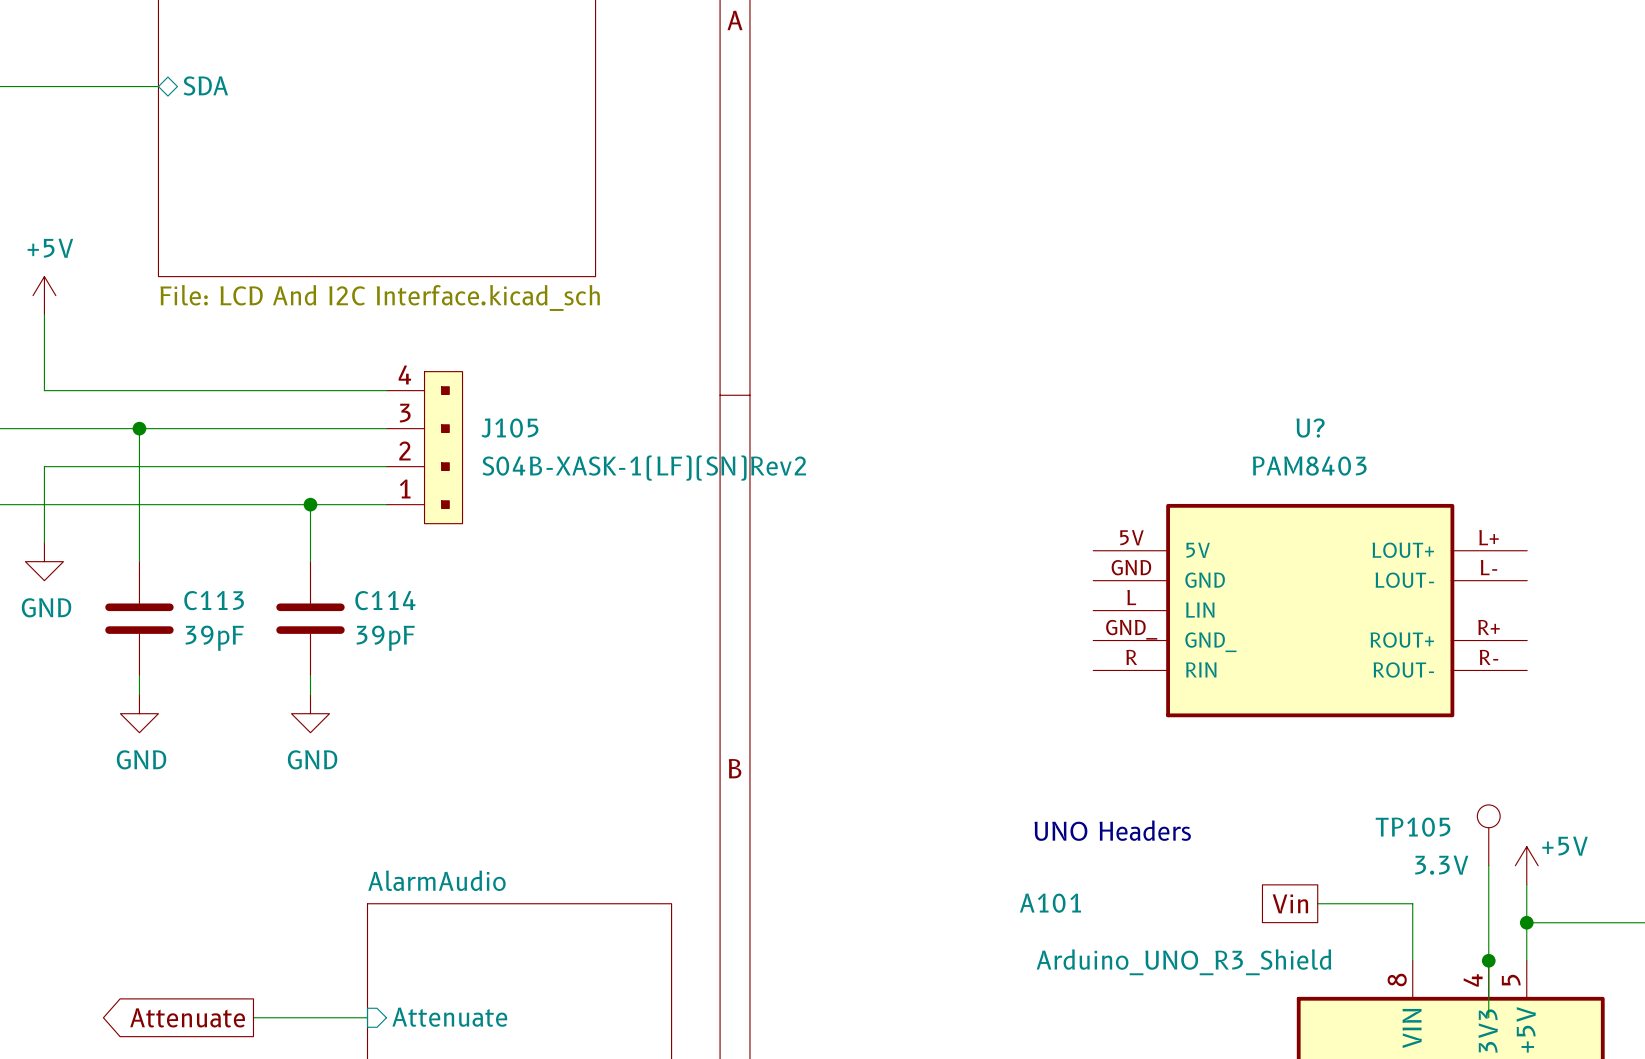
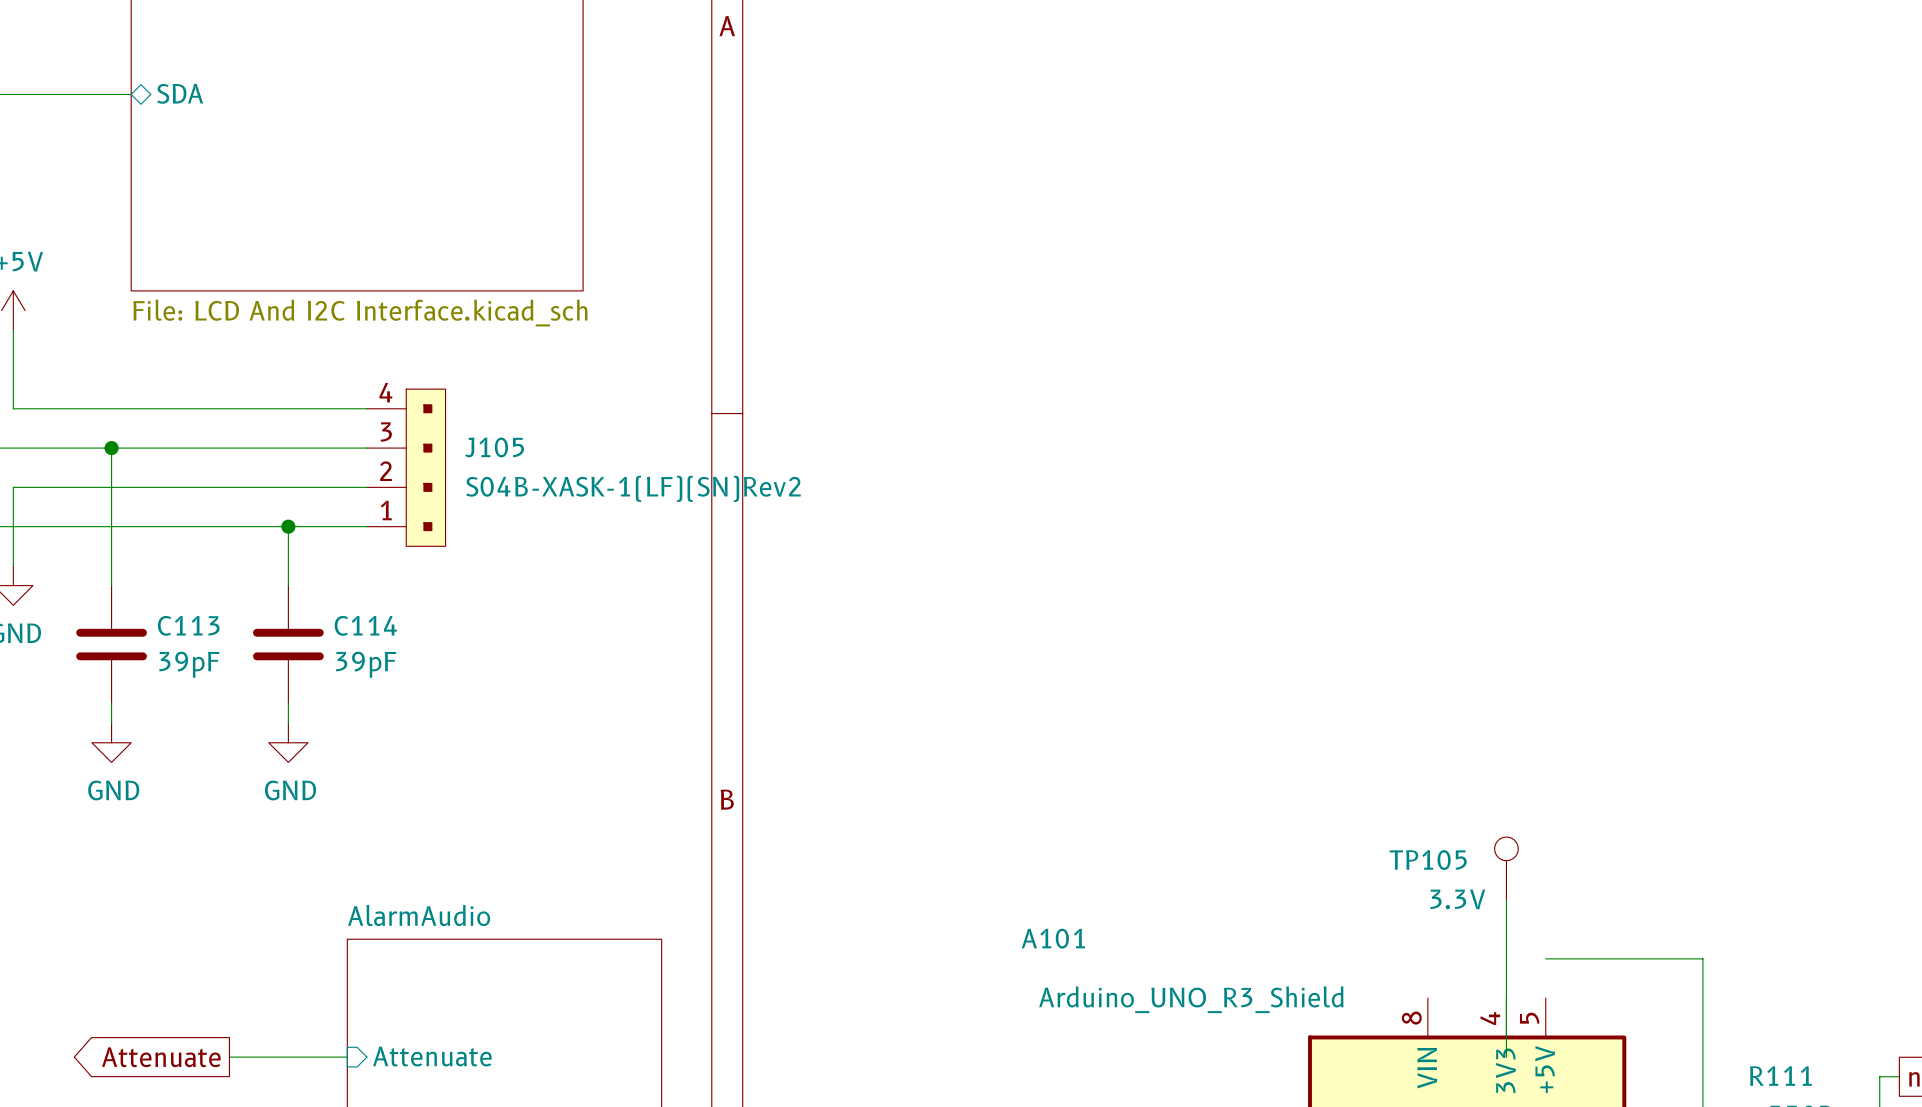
U?: PAM8403 (1310, 610) -> none
text: UNO Headers (1112, 830) -> none
power symbol: +5V (1526, 865) -> none
wire: (1526, 884) (1526, 960) -> none
global label: Vin (1290, 903) -> none
wire: (1317, 903) (1412, 903) (1412, 960) -> none
junction: (1526, 922) -> none
junction: (1488, 960) -> none

